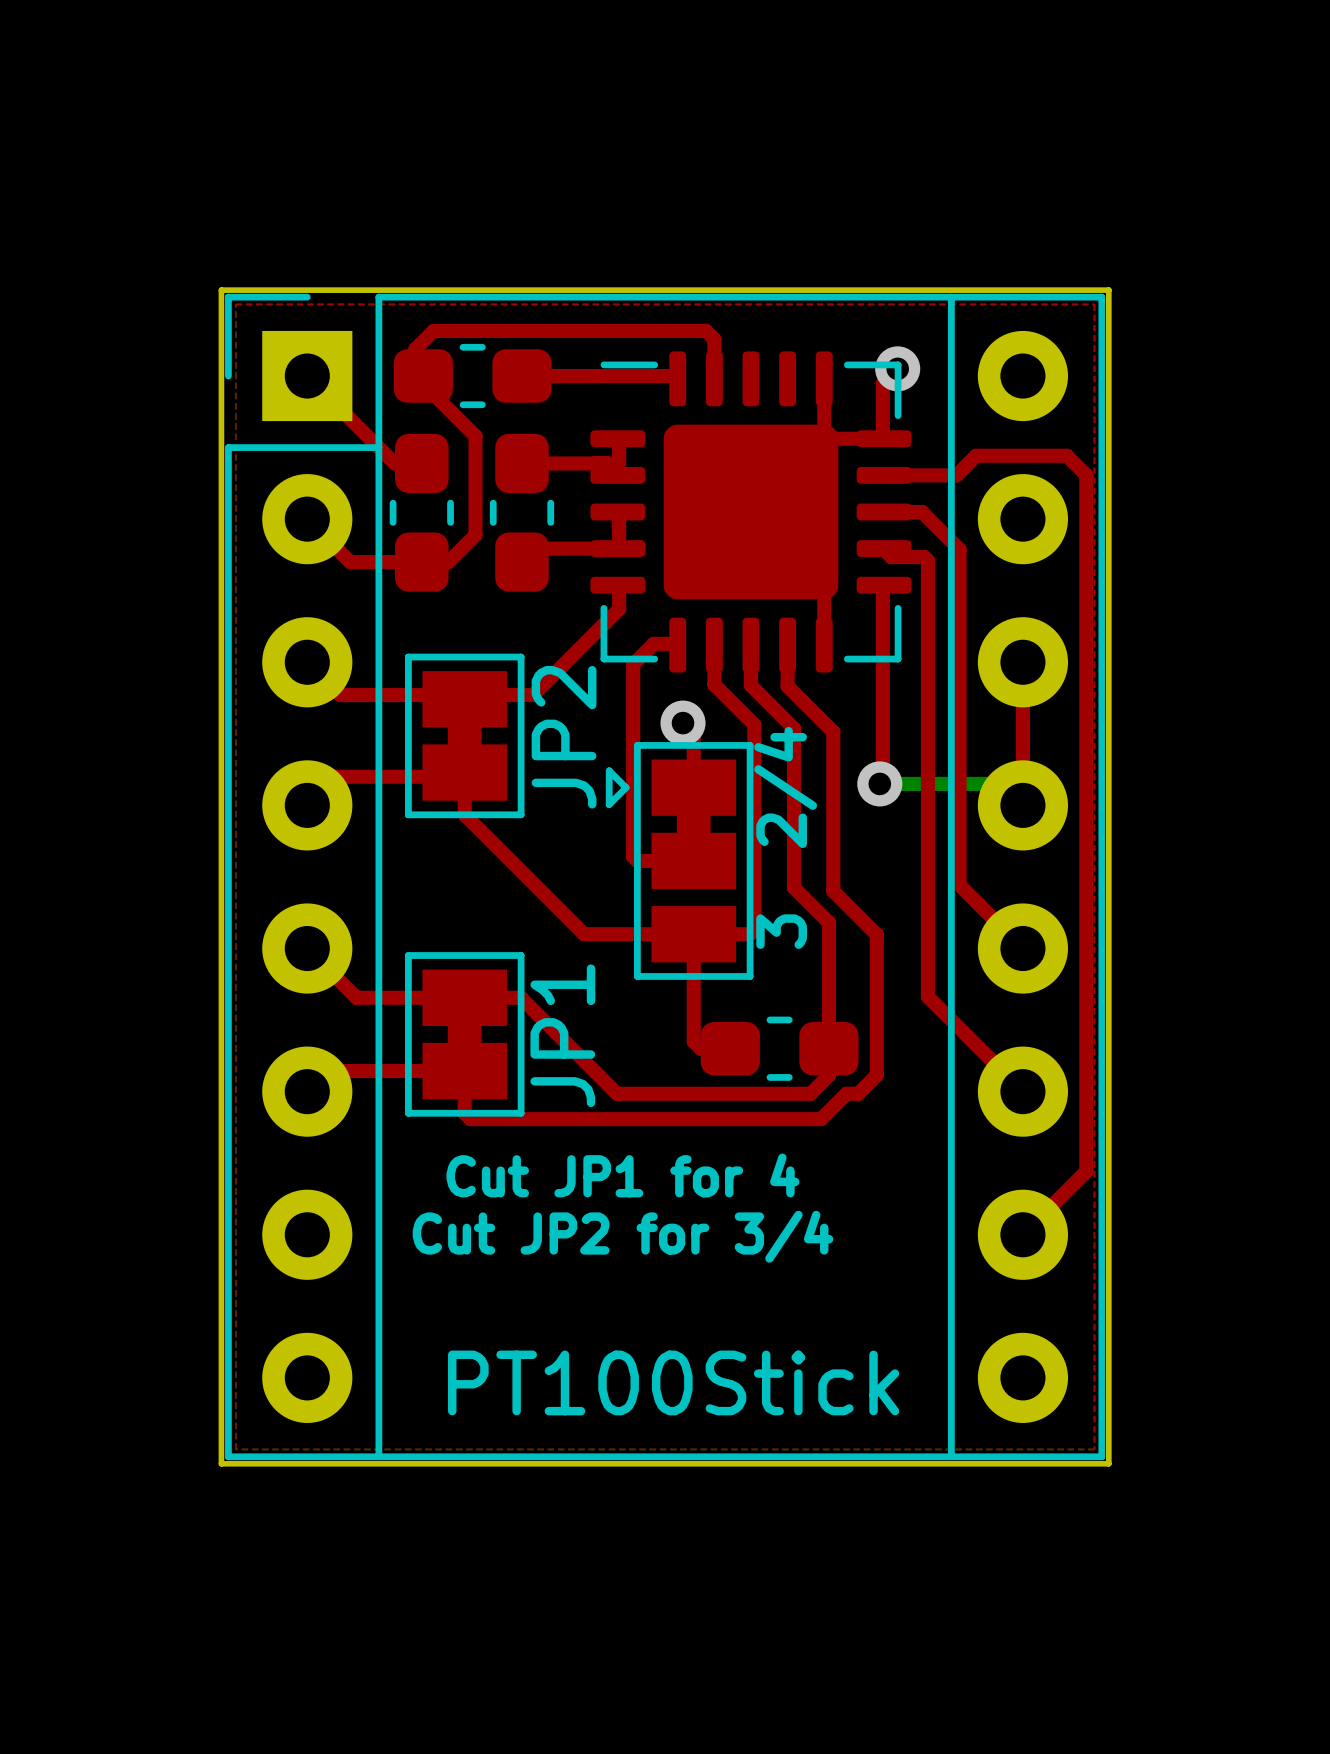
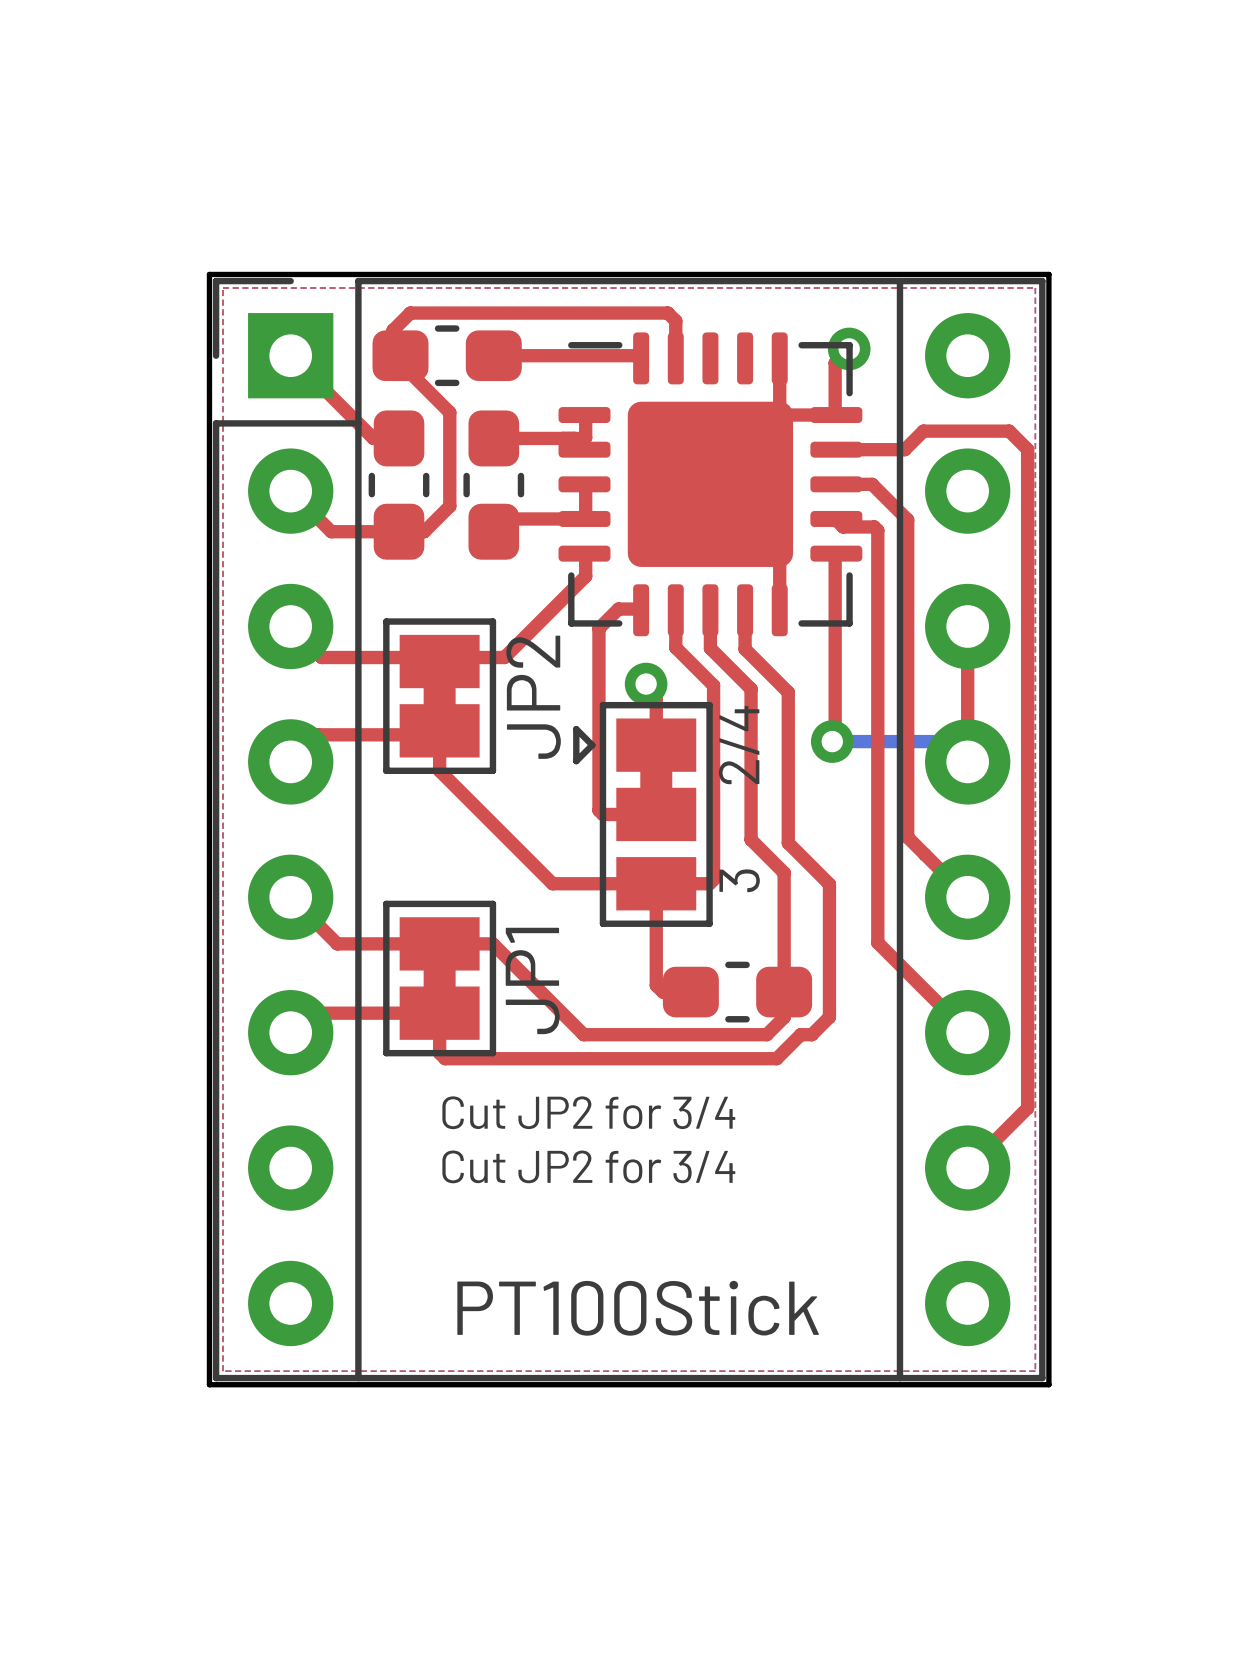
text: Cut JP1 for 4 (622, 1175) -> Cut JP2 for 3/4 (588, 1112)

